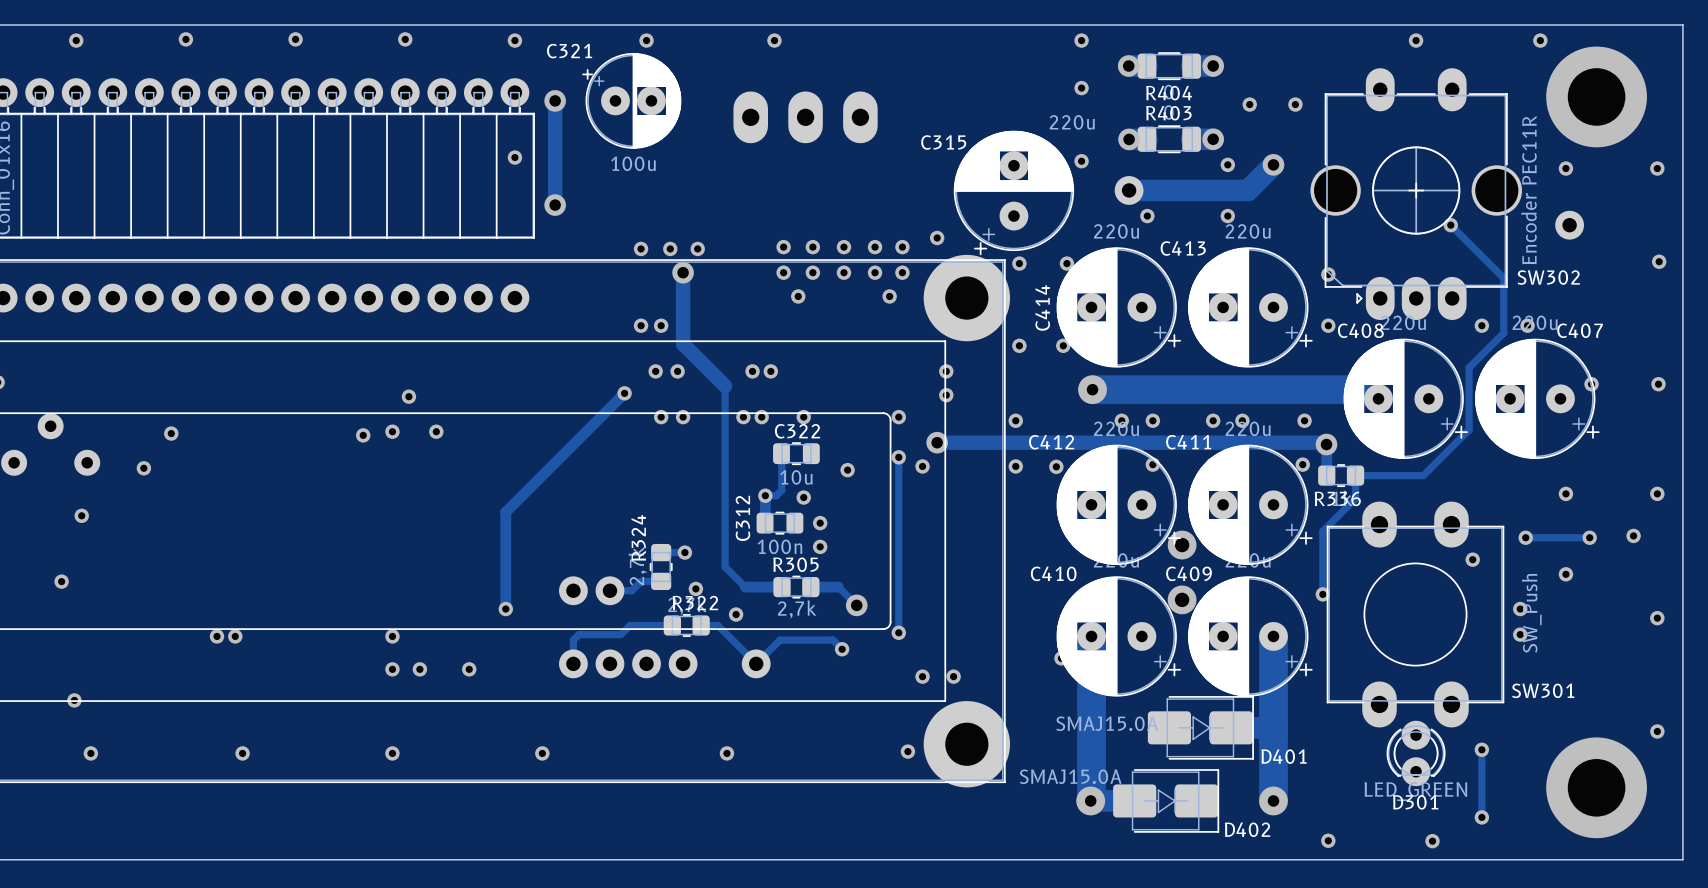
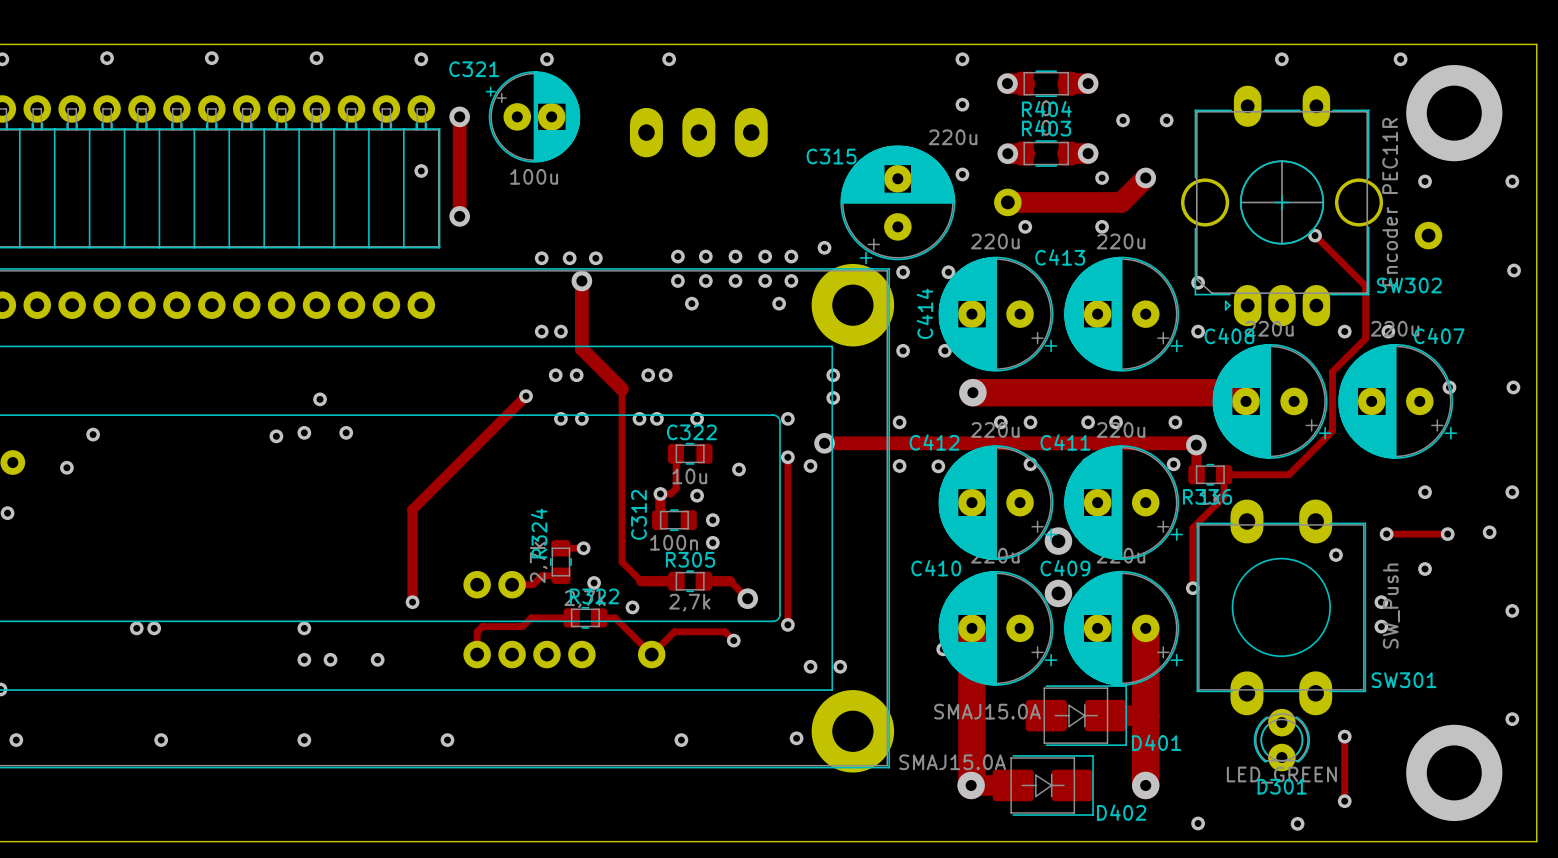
via position: (726, 753) -> (681, 740)

